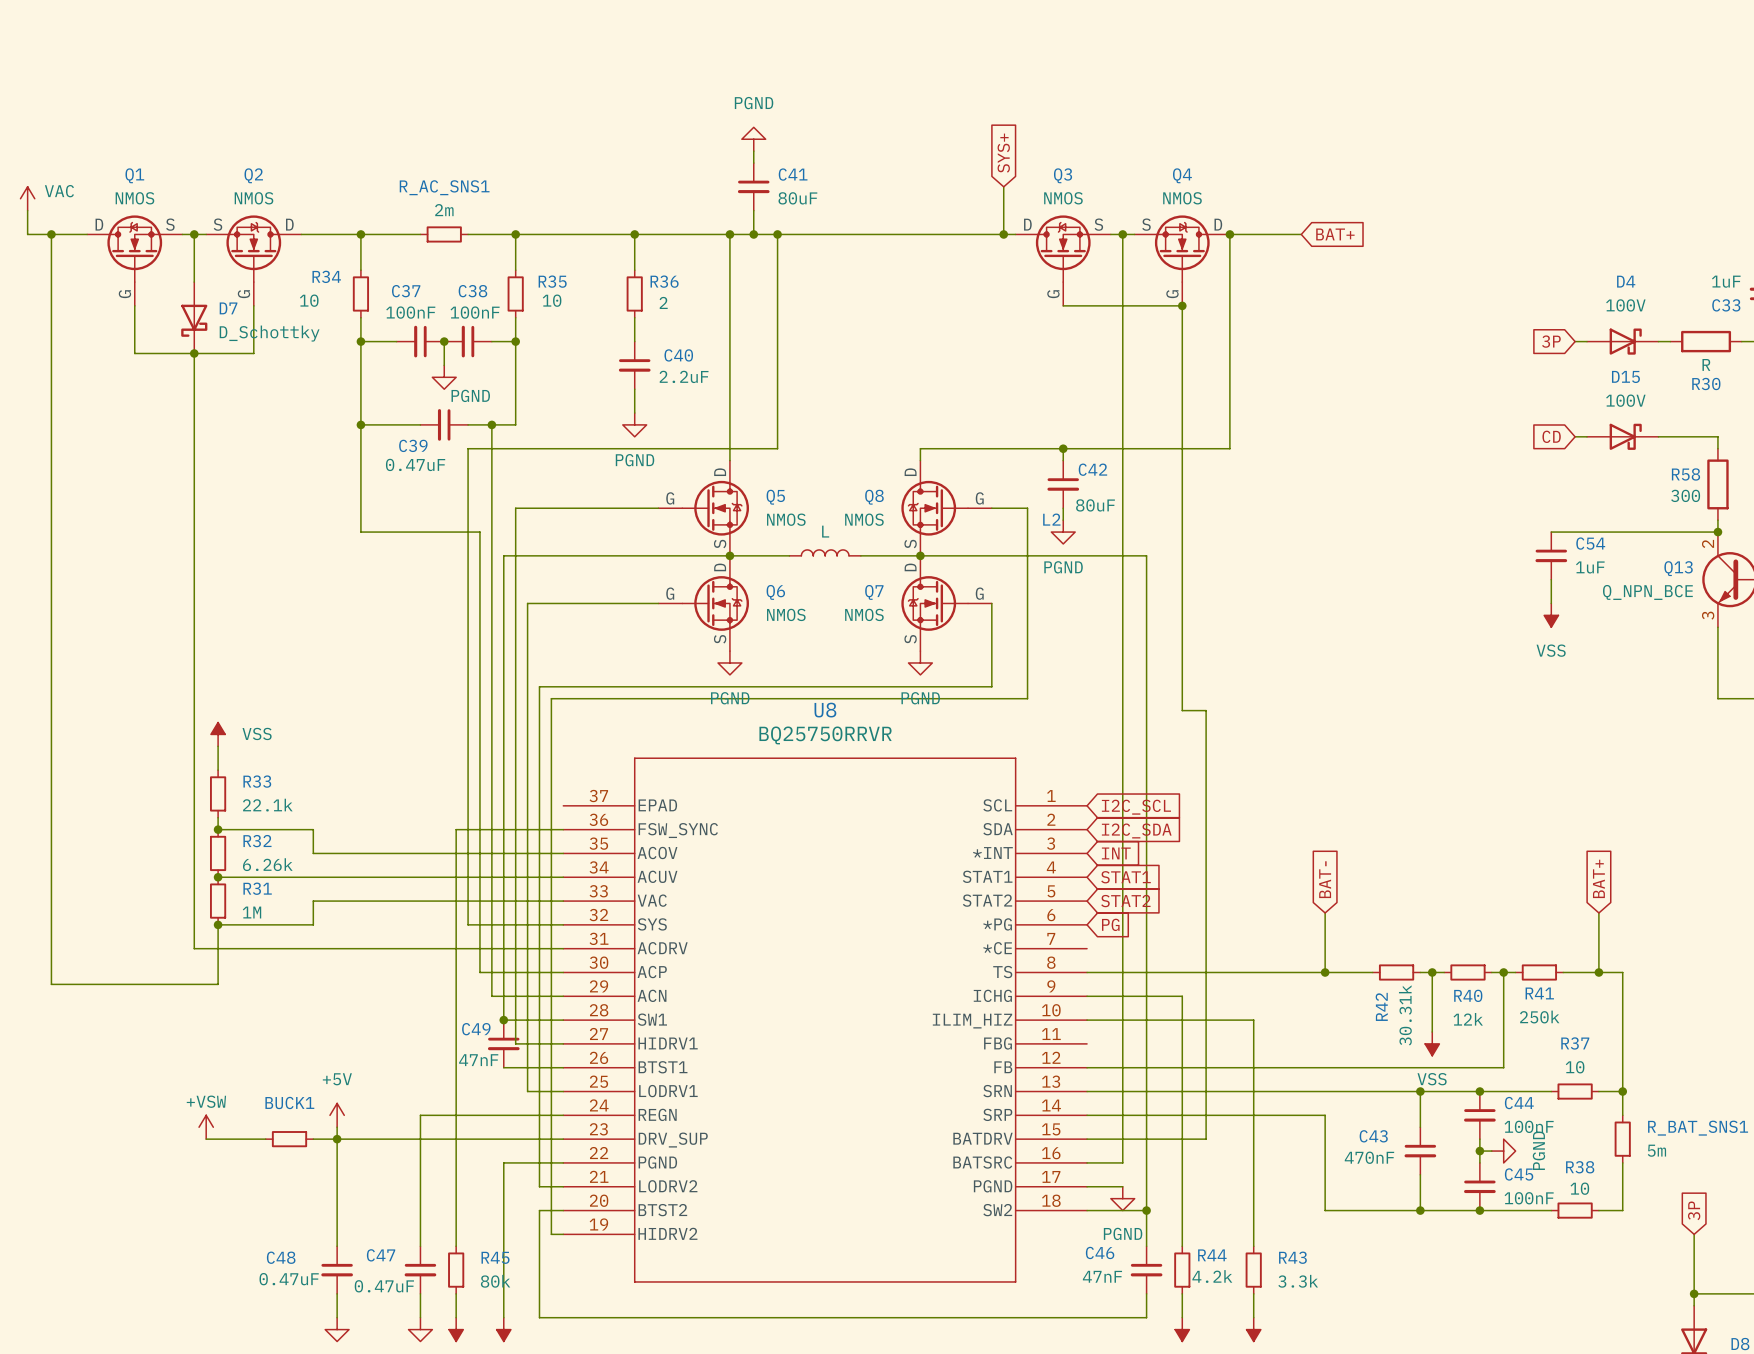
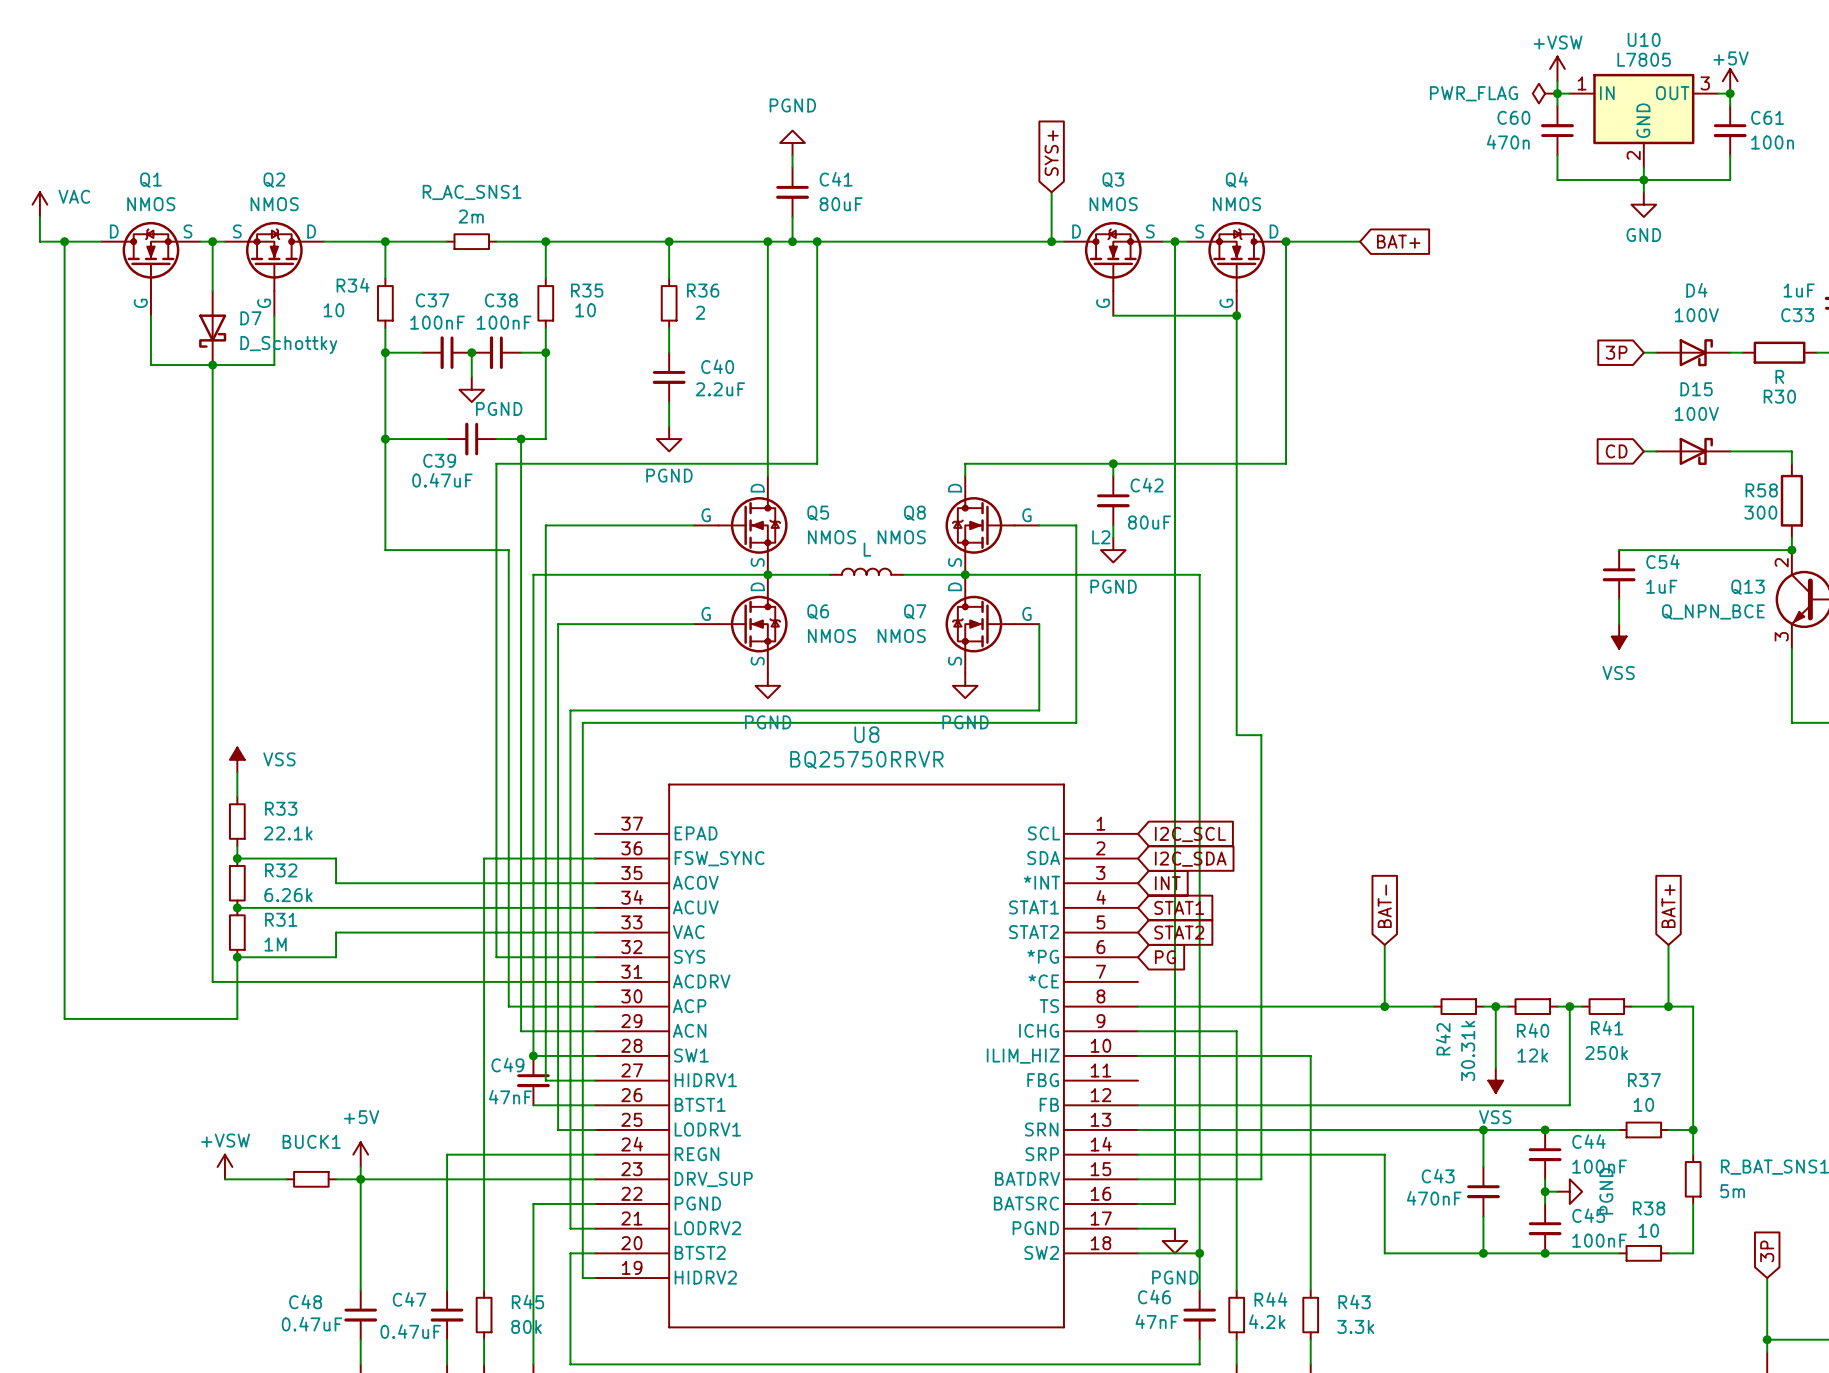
power symbol: none -> +VSW (1557, 68)
wire: none -> (1557, 81) (1557, 105)
power symbol: none -> +5V (1730, 81)
power symbol: none -> PWR_FLAG (1545, 93)
wire: none -> (1557, 93) (1569, 93)
junction: none -> (1557, 93)
wire: none -> (1717, 93) (1730, 93) (1730, 105)
junction: none -> (1730, 93)
U10: none -> L7805 (1643, 120)
C60: none -> 470n (1557, 130)
C61: none -> 100n (1730, 130)
wire: none -> (1557, 155) (1557, 179) (1730, 179) (1730, 155)
wire: none -> (1643, 167) (1643, 192)
junction: none -> (1643, 179)
power symbol: none -> GND (1643, 204)

